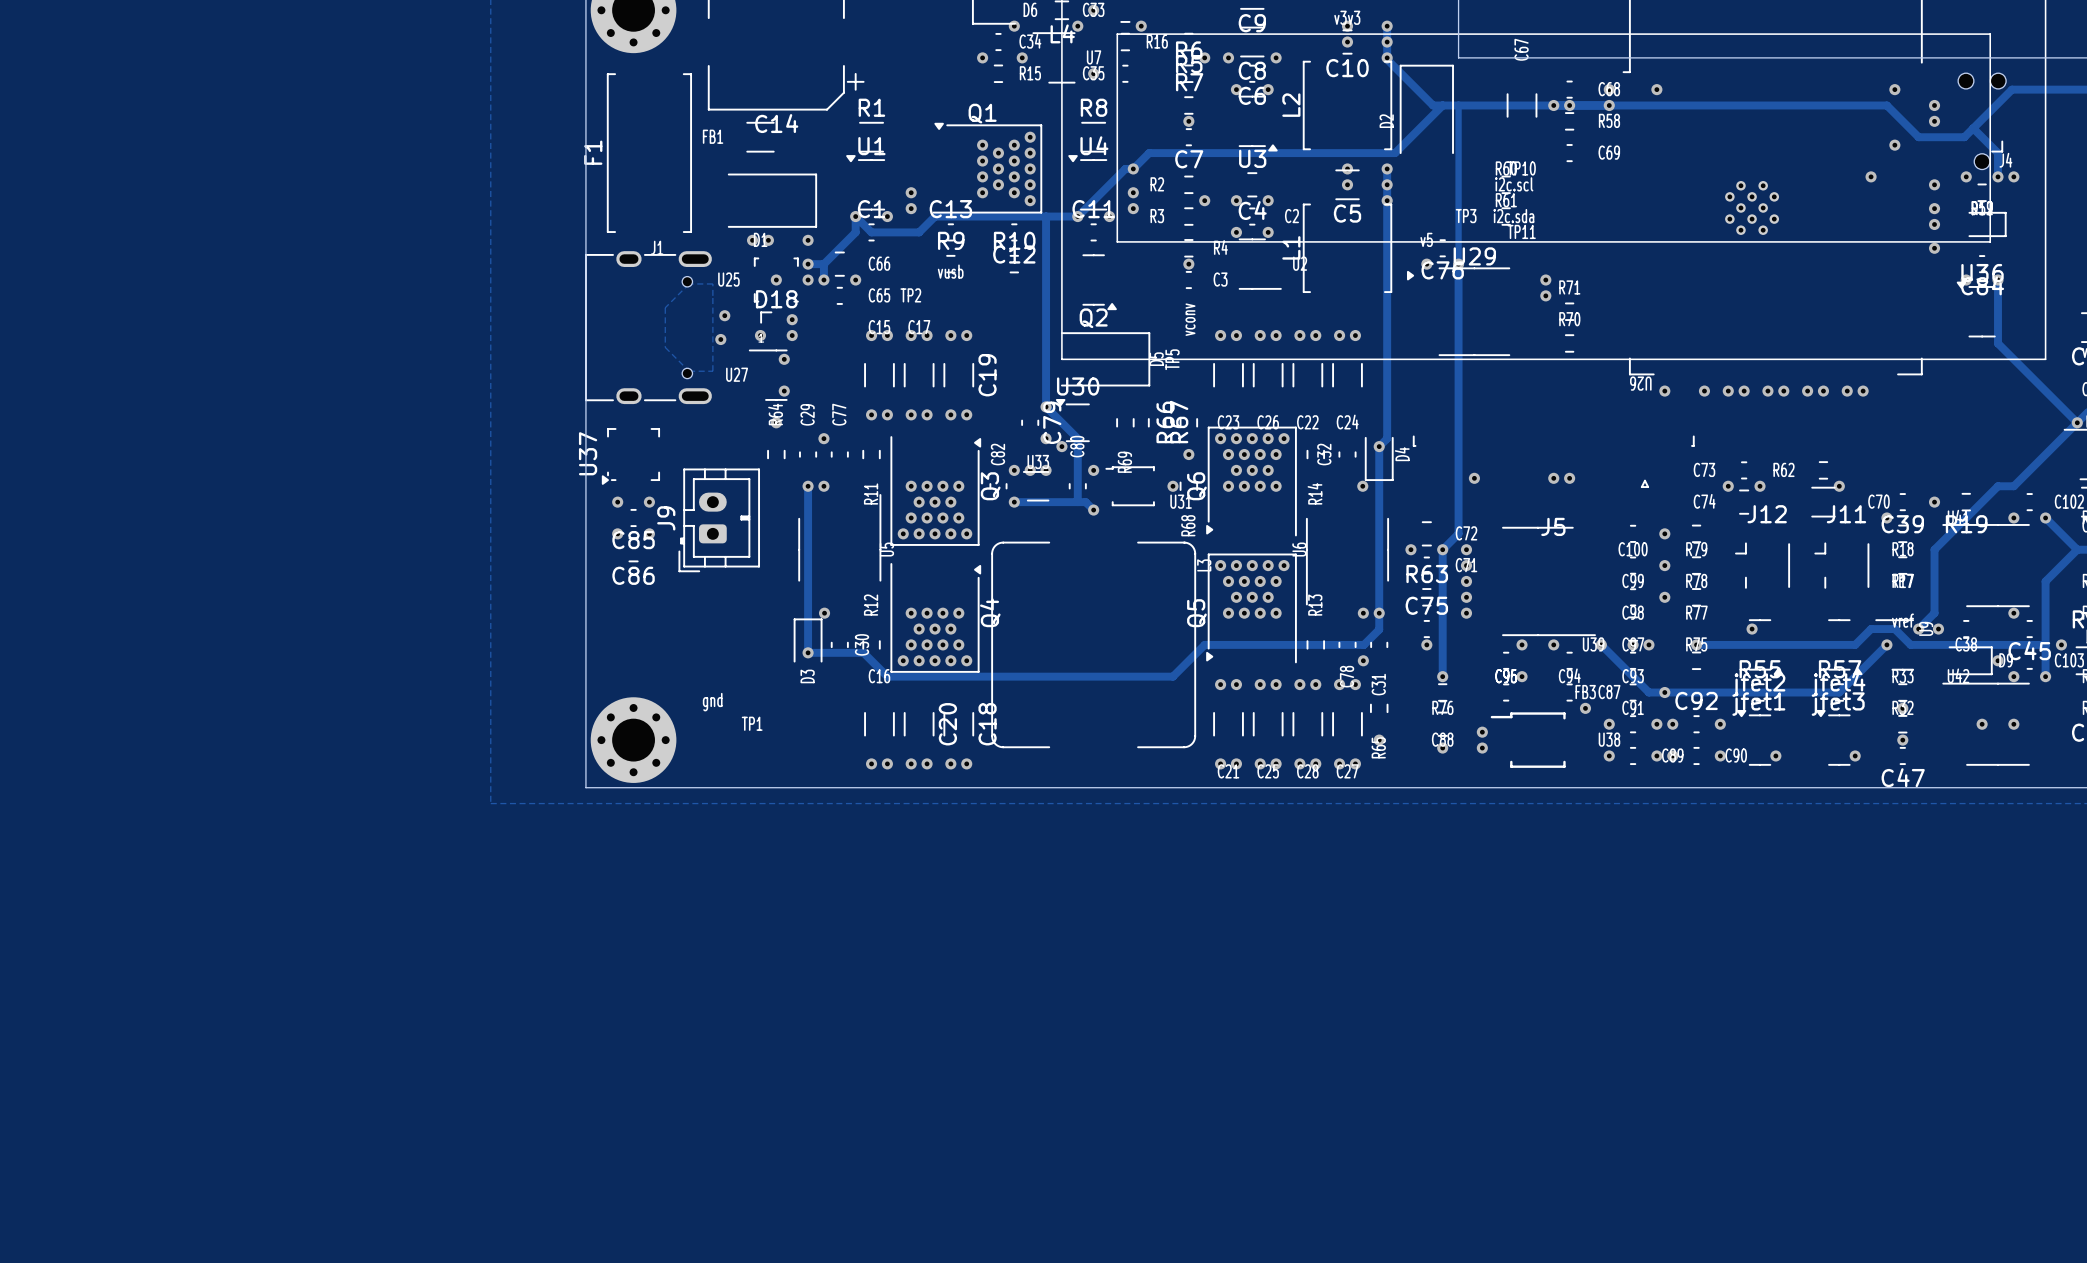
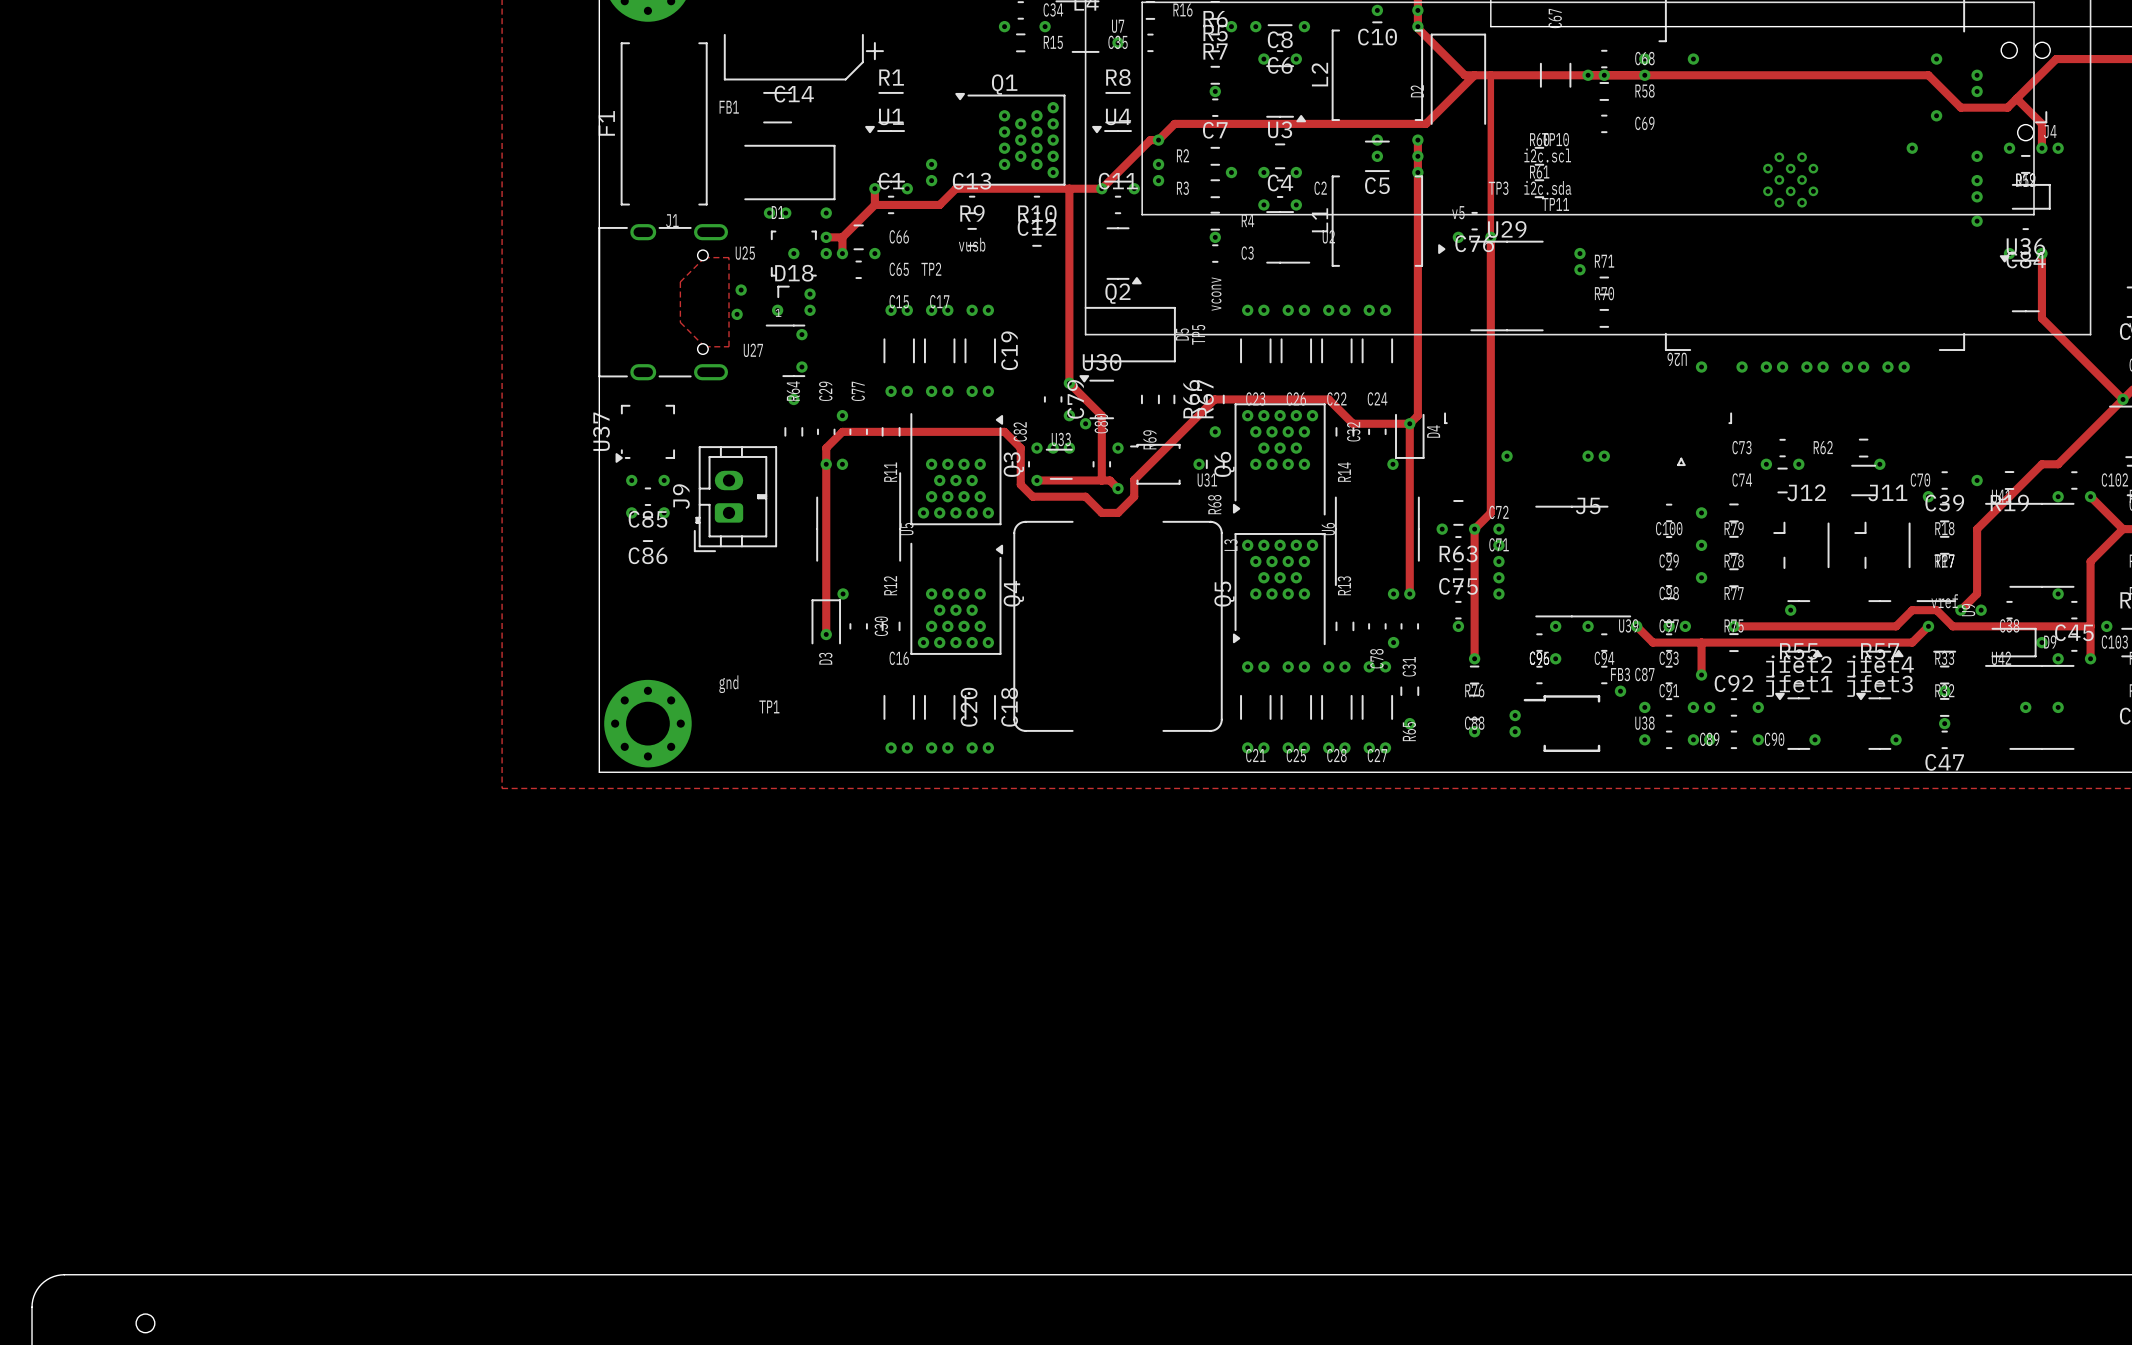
track: (855, 216) (871, 232) -> (874, 204) (891, 204)
track: none -> (1409, 423) (1353, 423) (1328, 399) (1214, 399) (1134, 479) (1134, 496) (1118, 512) (1101, 512) (1085, 496) (1032, 496) (1020, 484) (1020, 448) (1004, 431) (842, 431) (826, 448) (826, 464)
track: (1379, 613) (1379, 629) (1363, 644) (1204, 644) (1172, 676) (887, 676) (863, 652) (808, 652) -> none
track: (1617, 660) (1648, 692) (1839, 692) (1871, 660) -> (1652, 642) (1912, 642)
track: none -> (1701, 642) (1701, 675)

